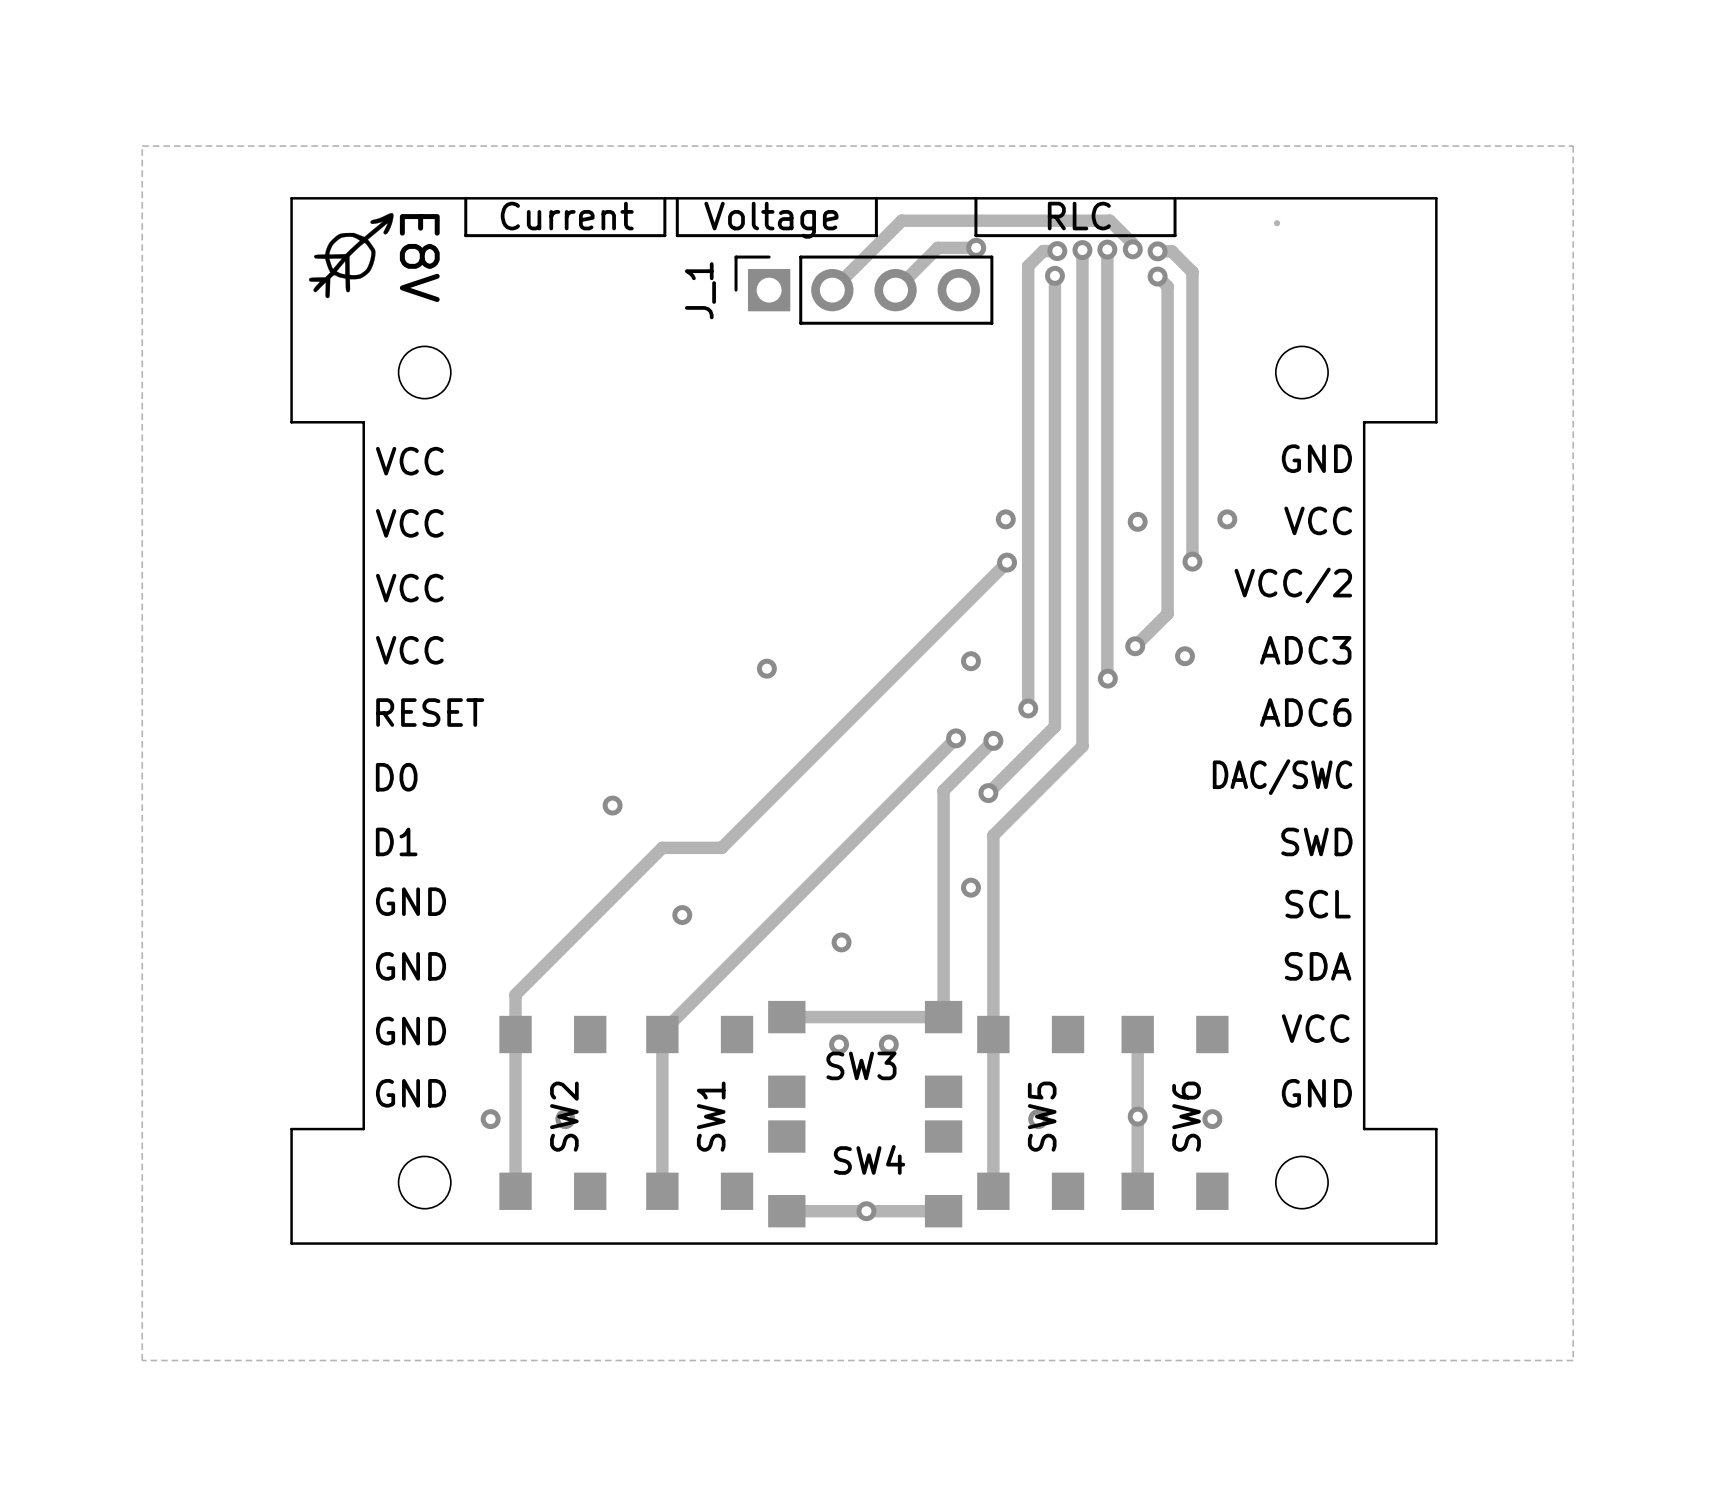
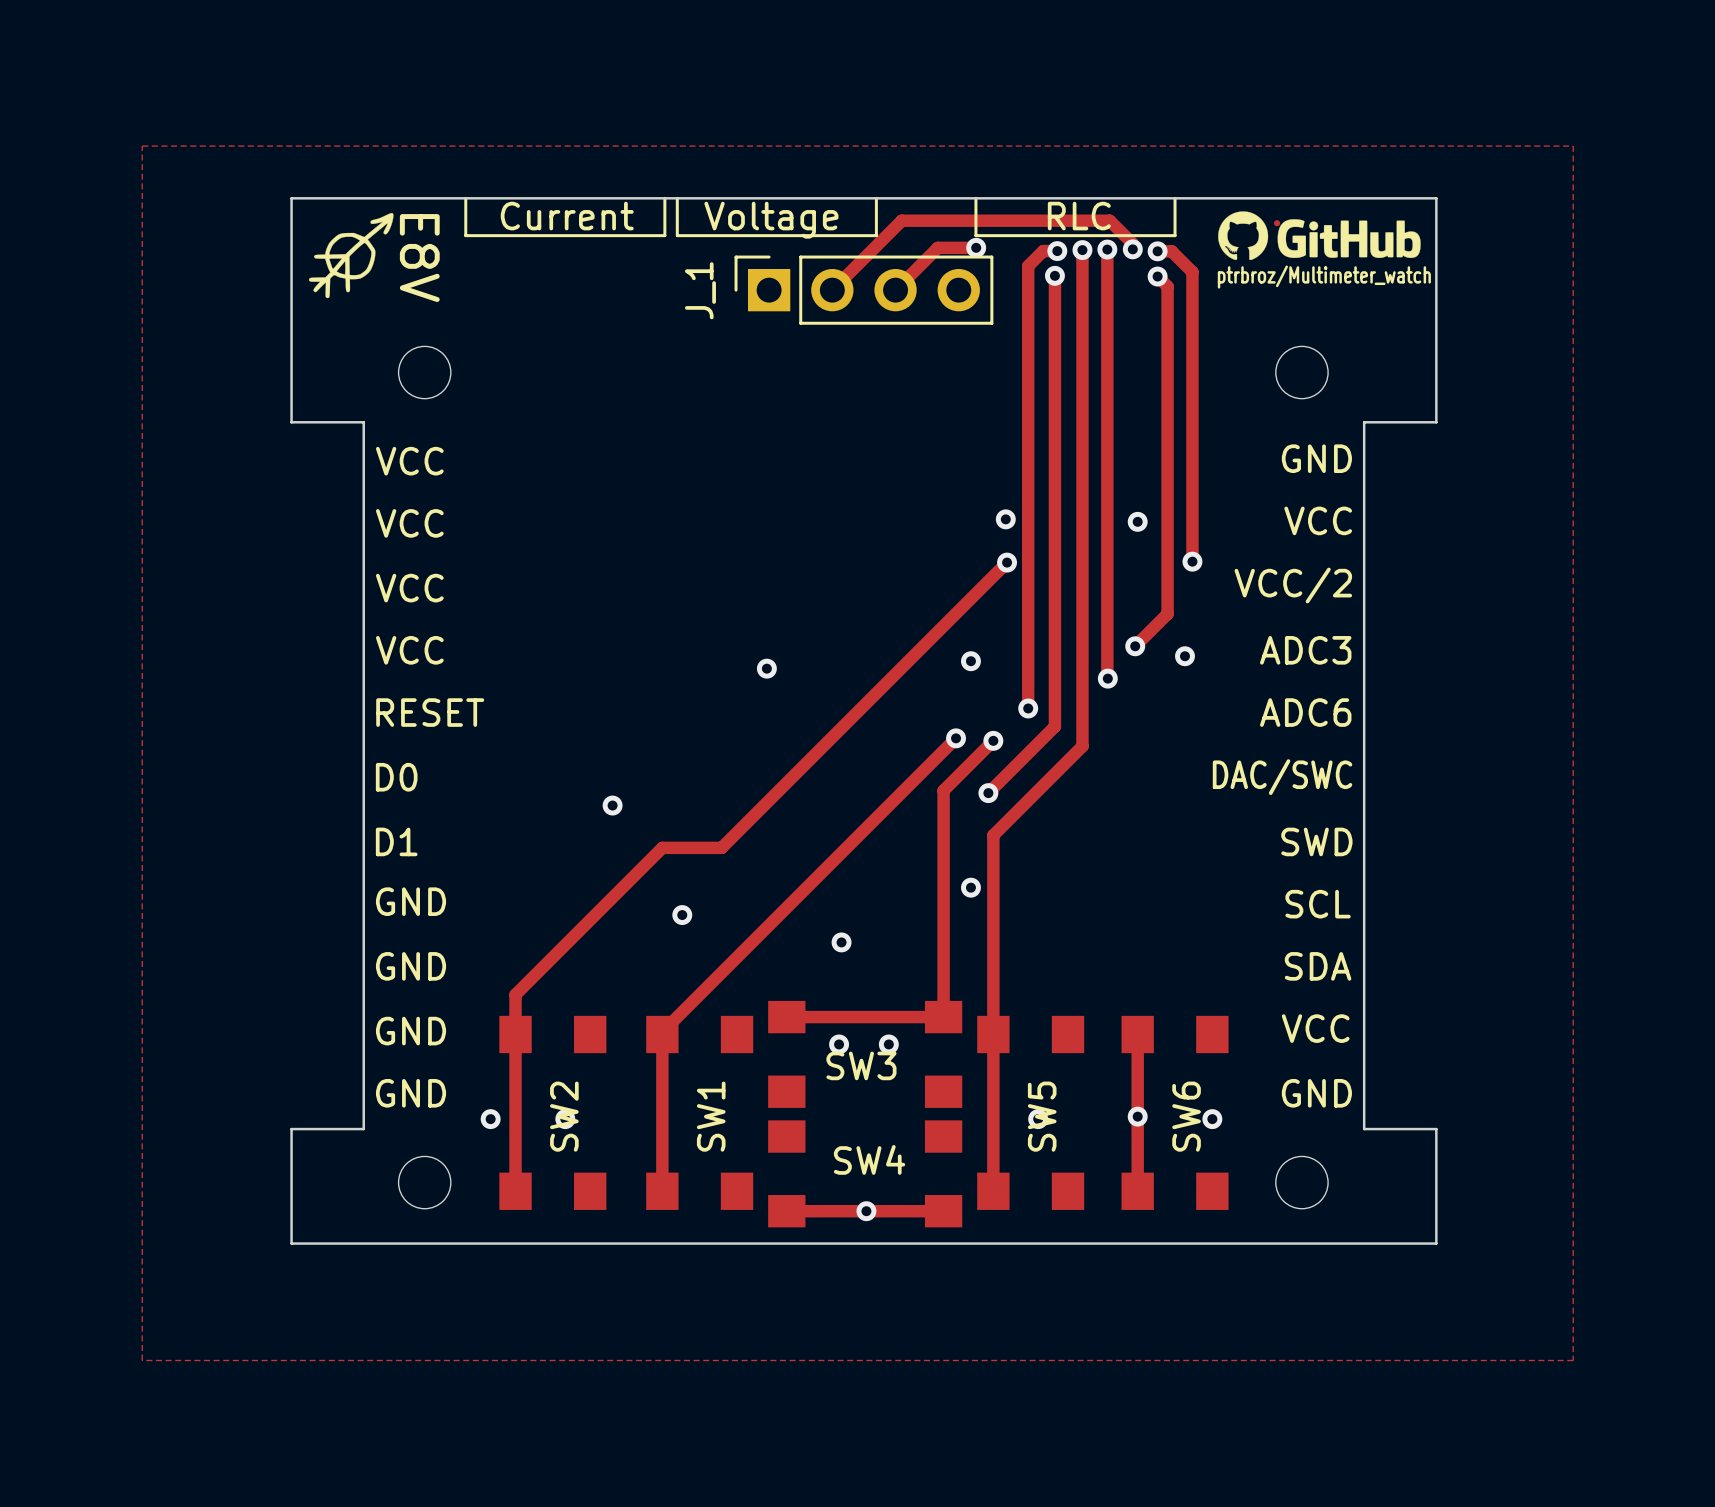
drawing: none -> [1218, 211, 1421, 261]
text: none -> ptrbroz/Multimeter_watch (1324, 277)
via: (1227, 519) -> none

